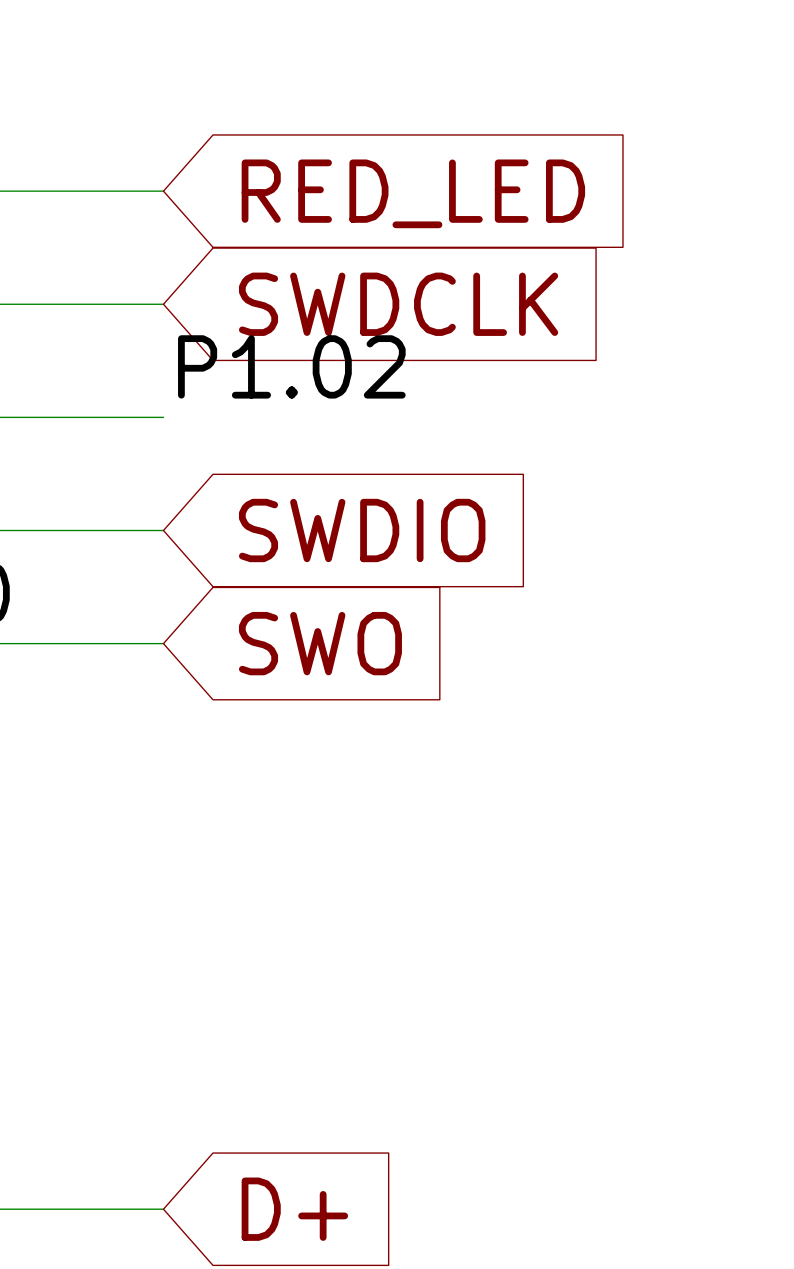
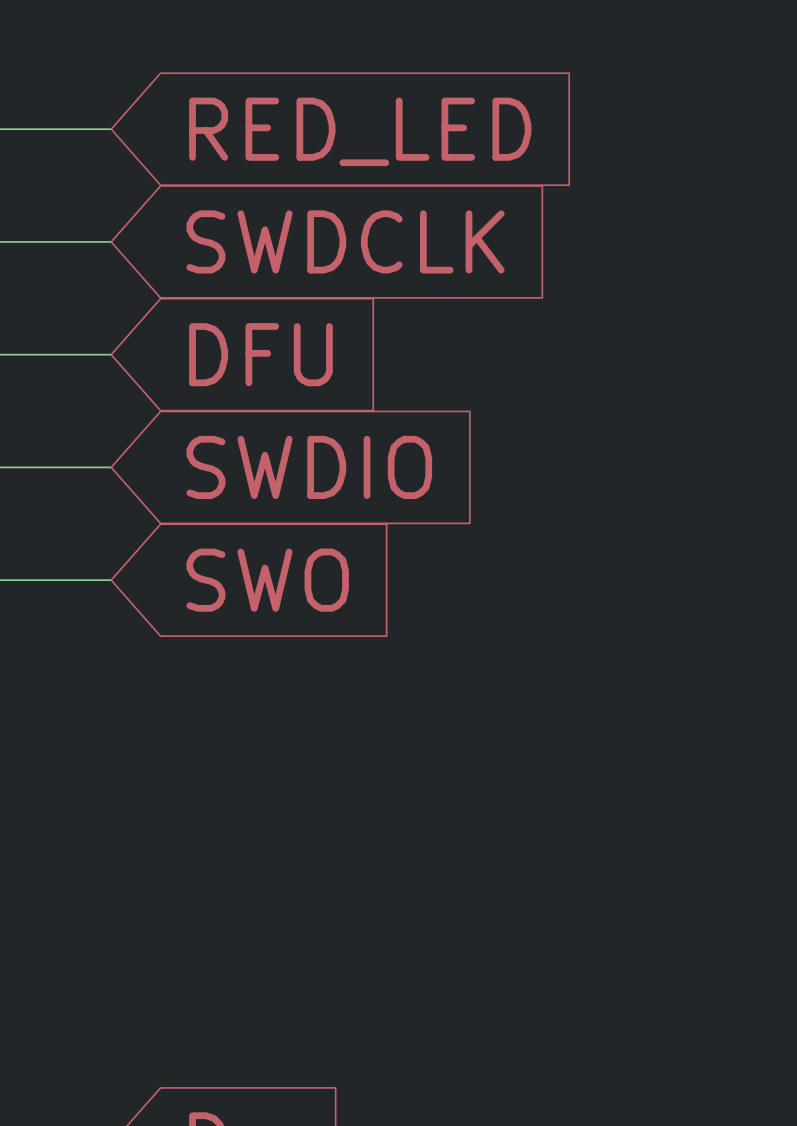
label: P1.02 (291, 366) -> none
global label: none -> DFU (260, 354)

